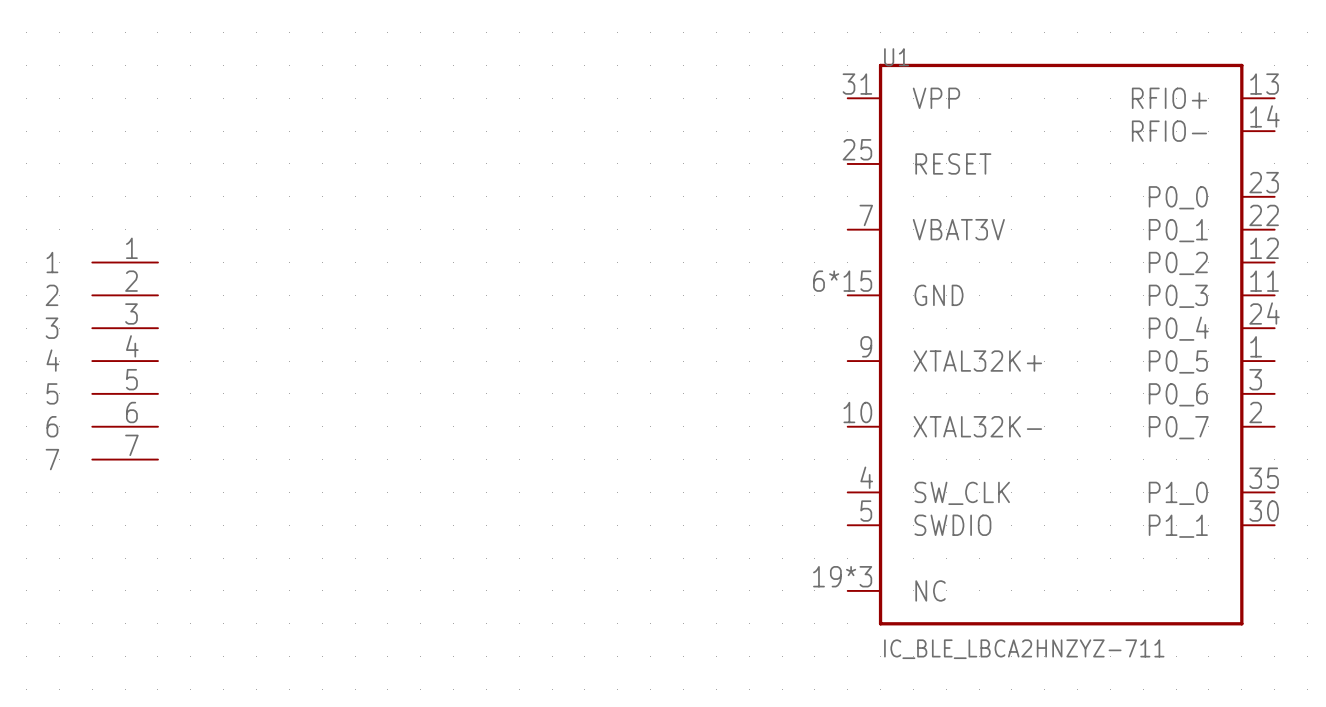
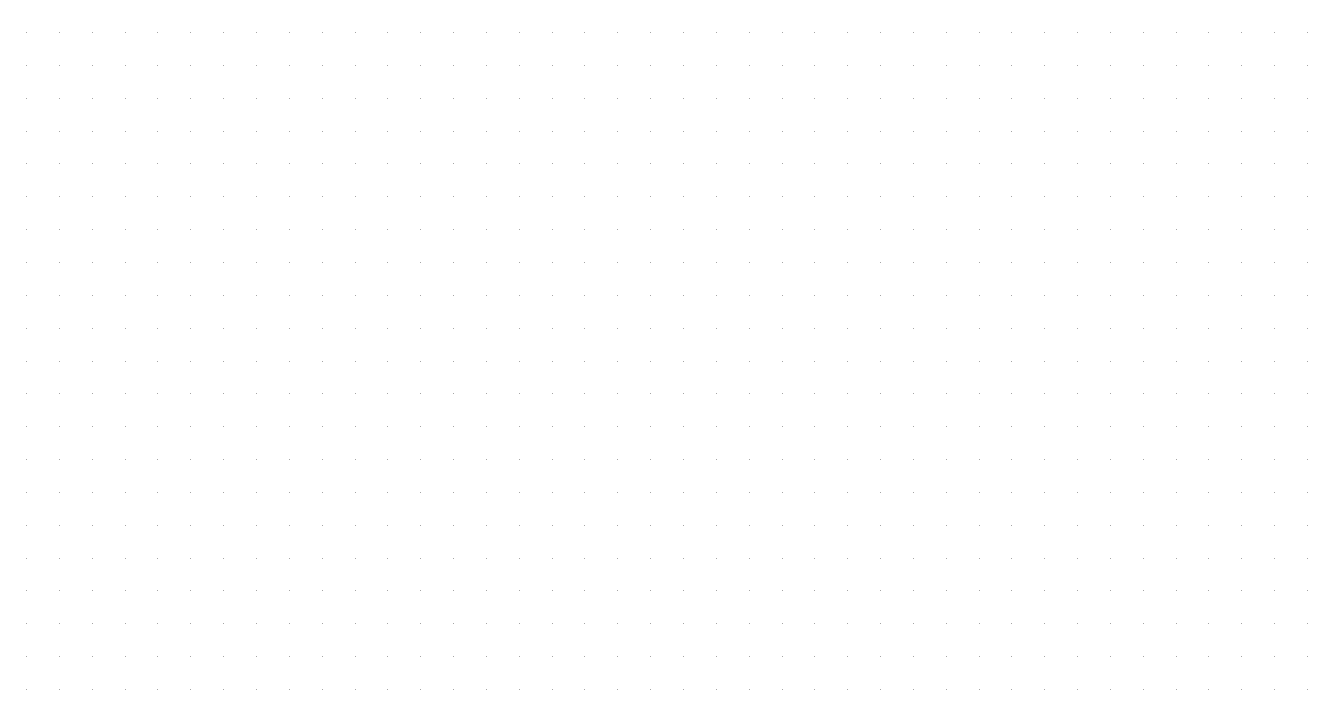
U1: IC_BLE_LBCA2HNZYZ-711 (1061, 344) -> none
part: (125, 361) -> none

